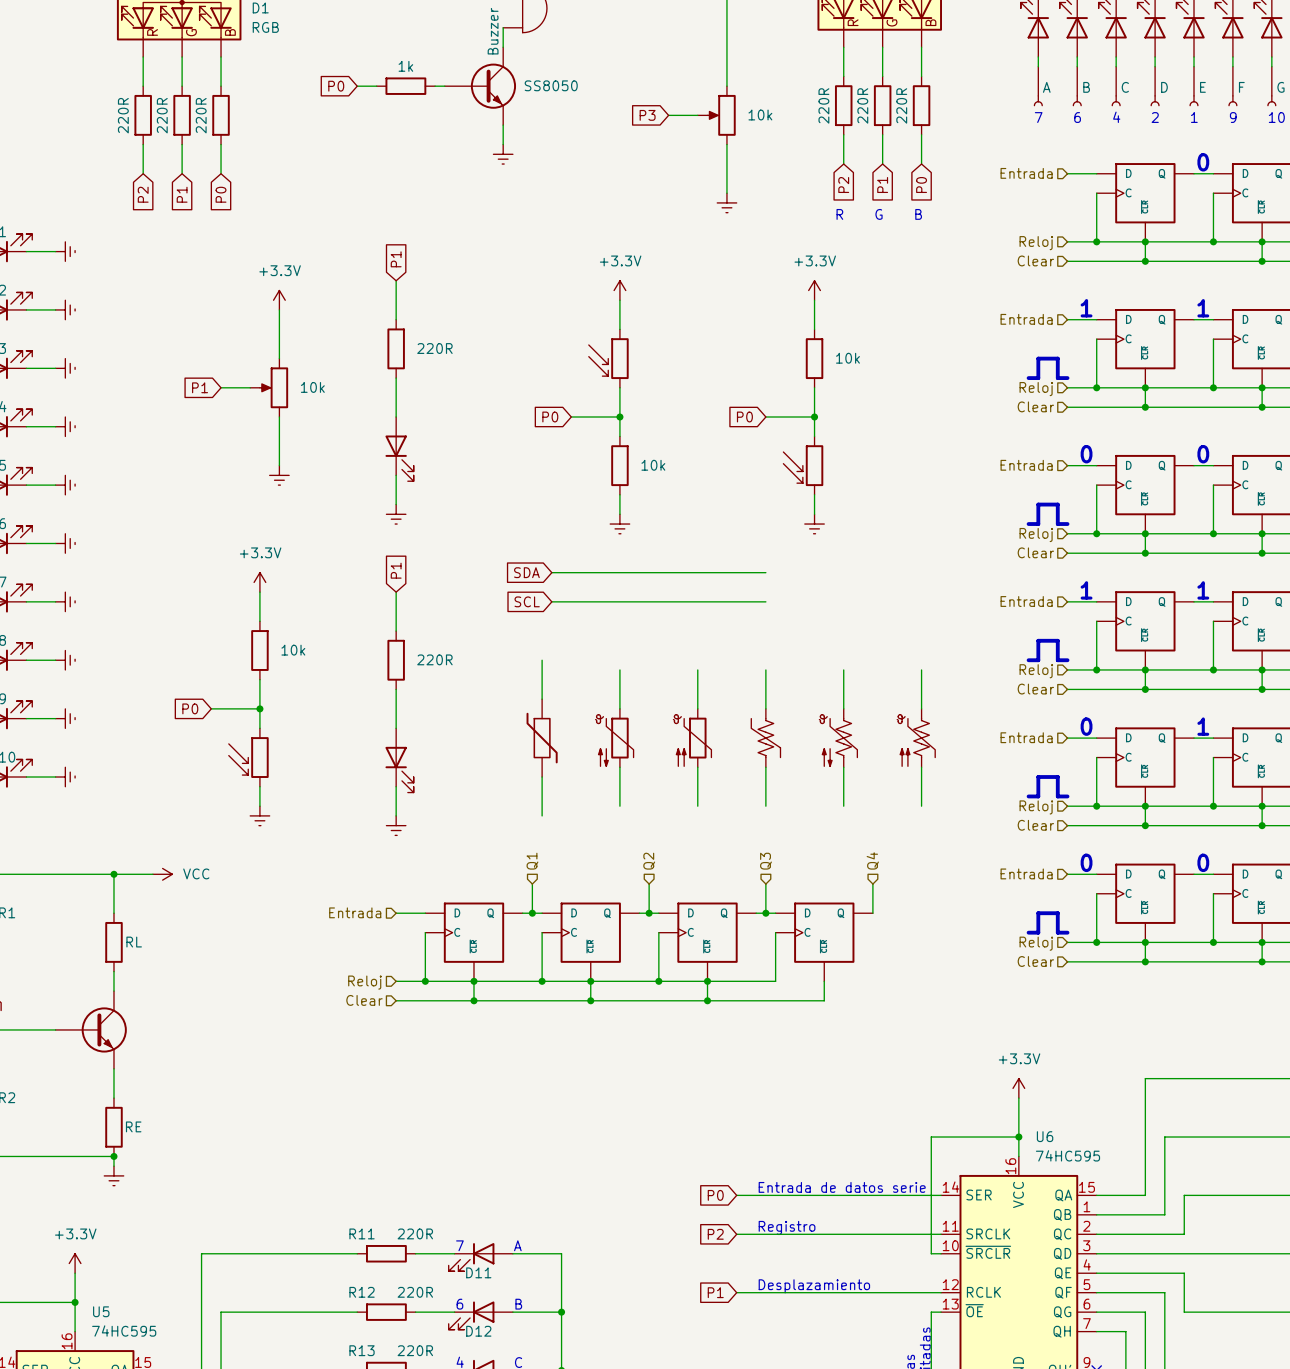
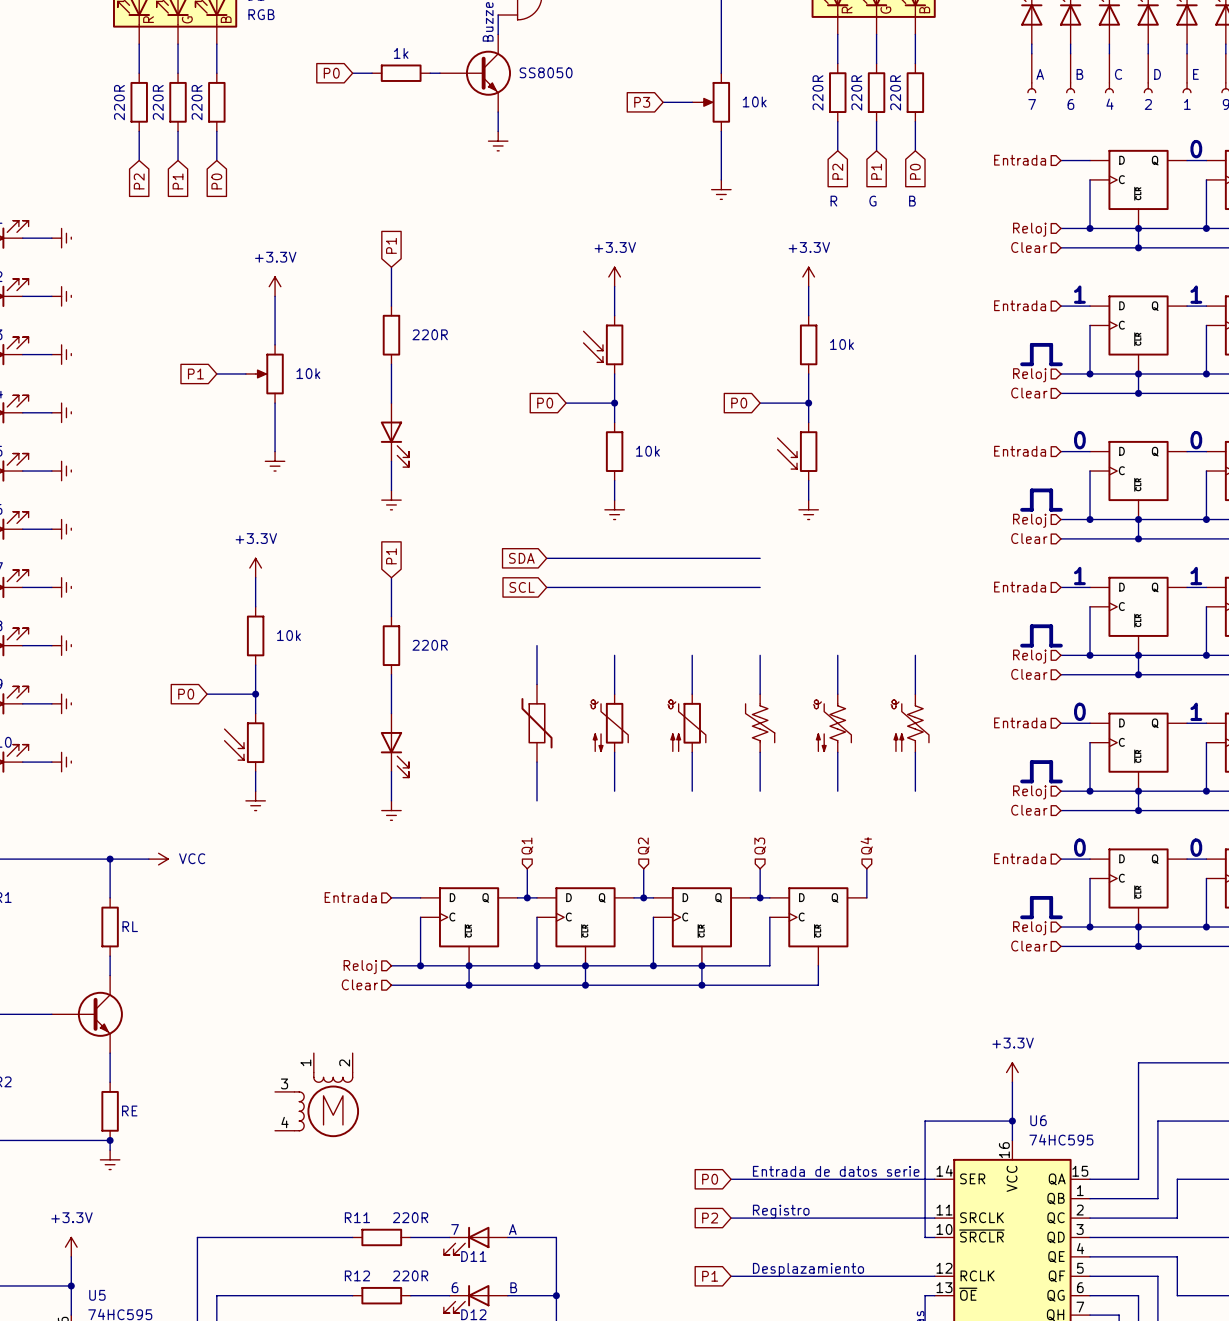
part: none -> (317, 1095)

